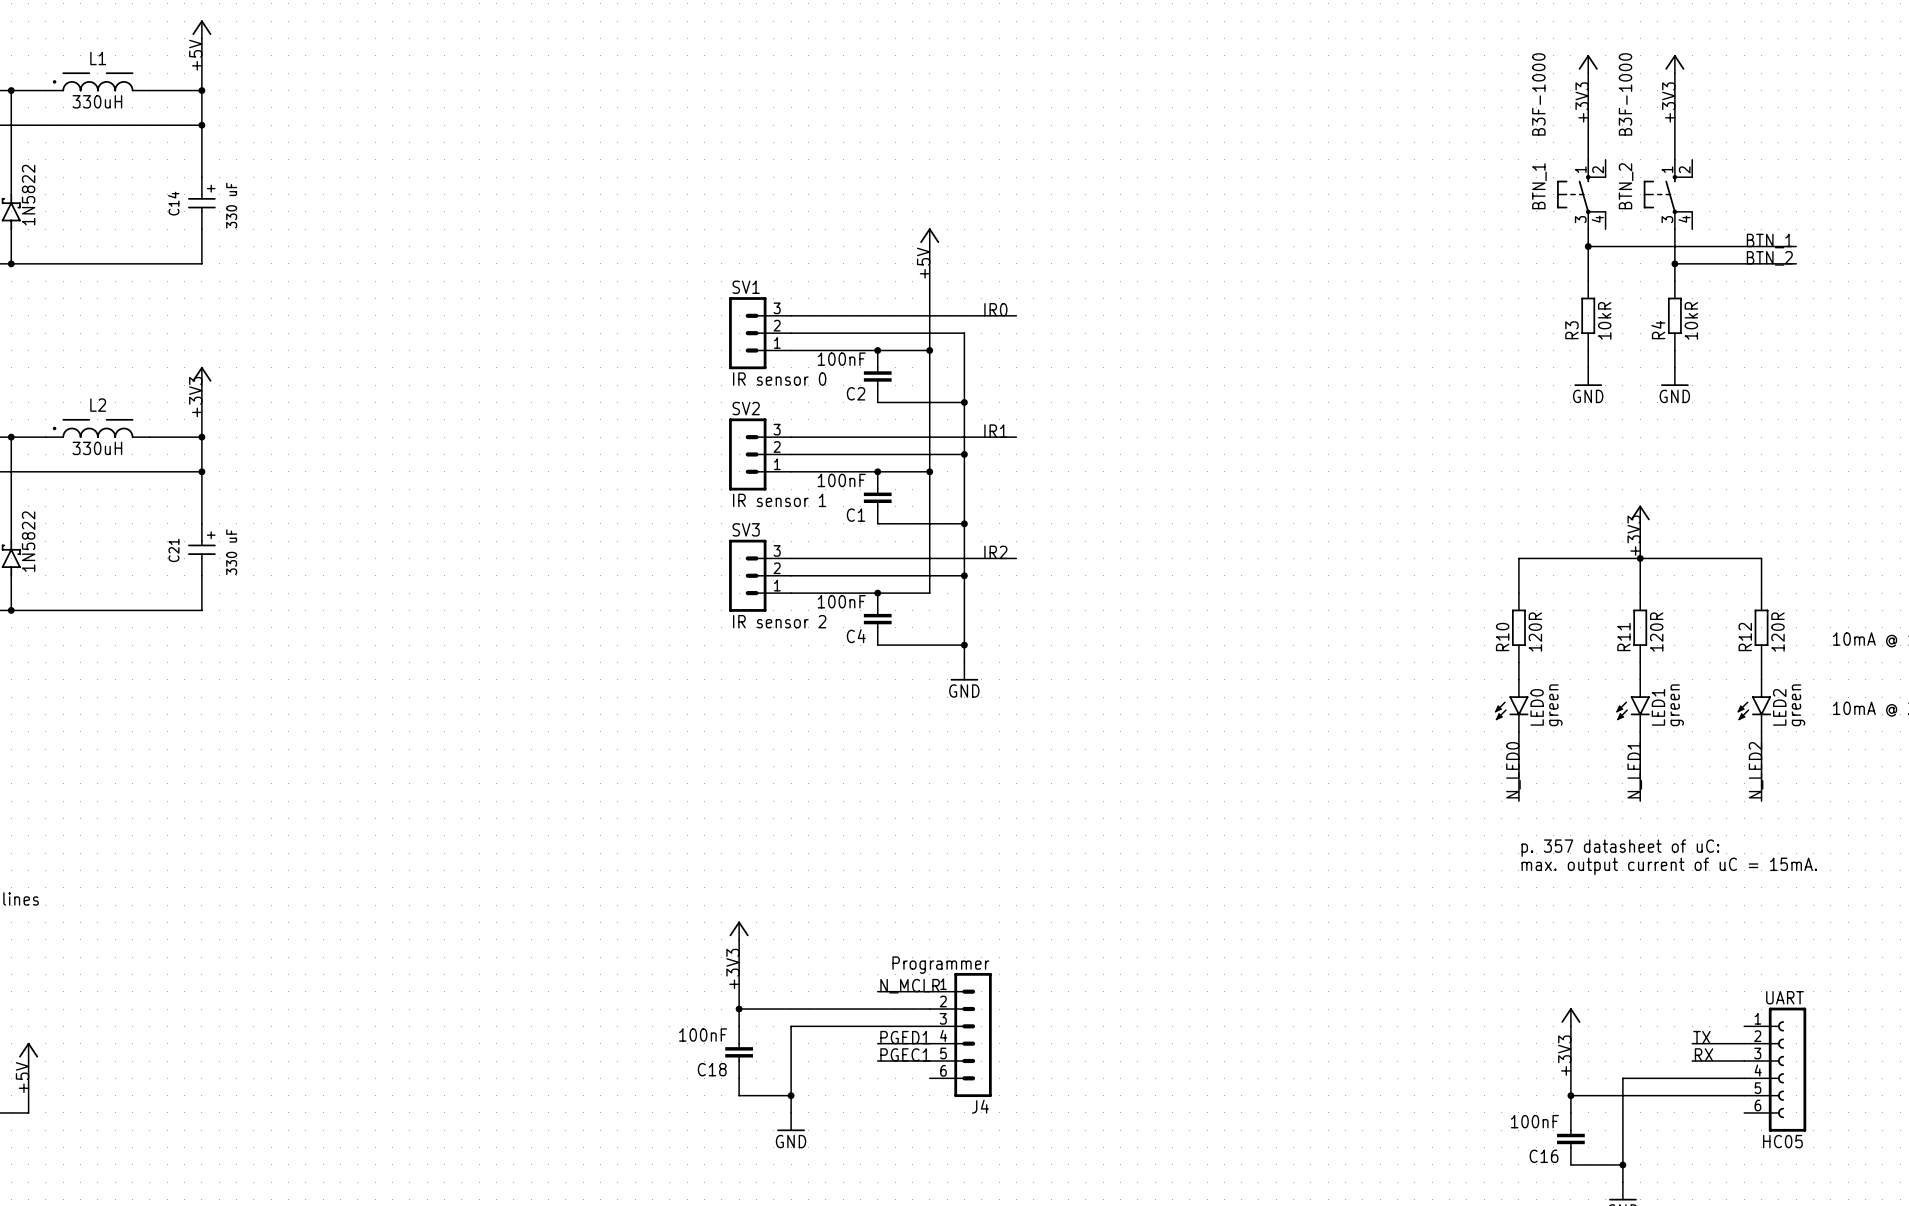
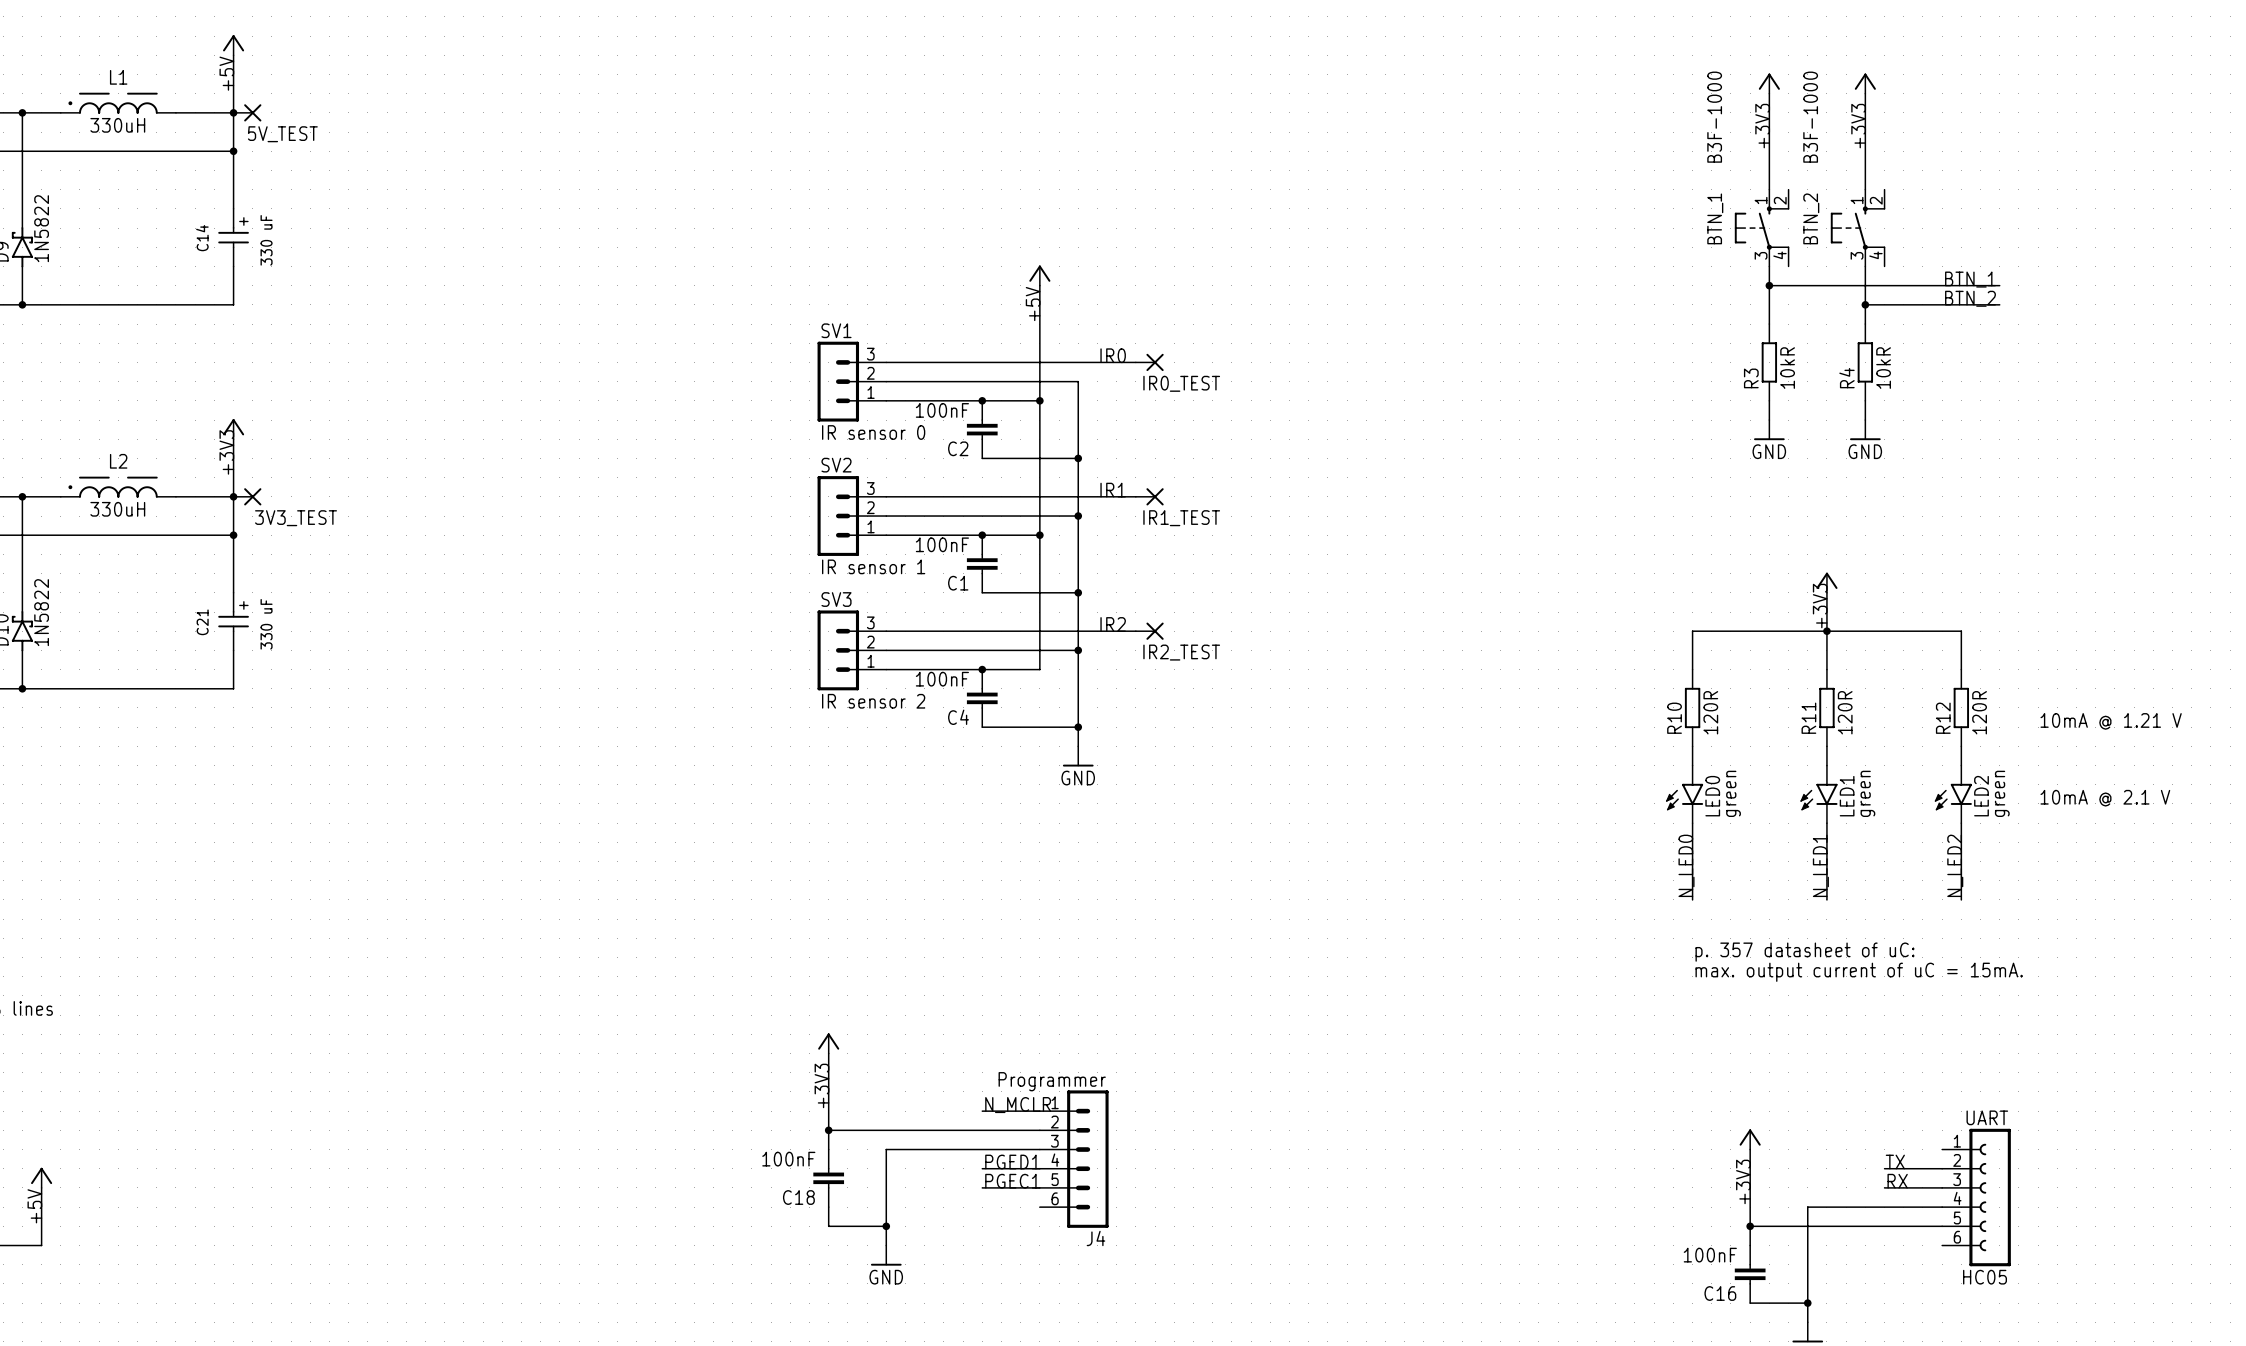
5V_TEST: none -> (247, 112)
IR0_TEST: none -> (1149, 362)
3V3_TEST: none -> (247, 496)
IR1_TEST: none -> (1149, 496)
IR2_TEST: none -> (1149, 631)

